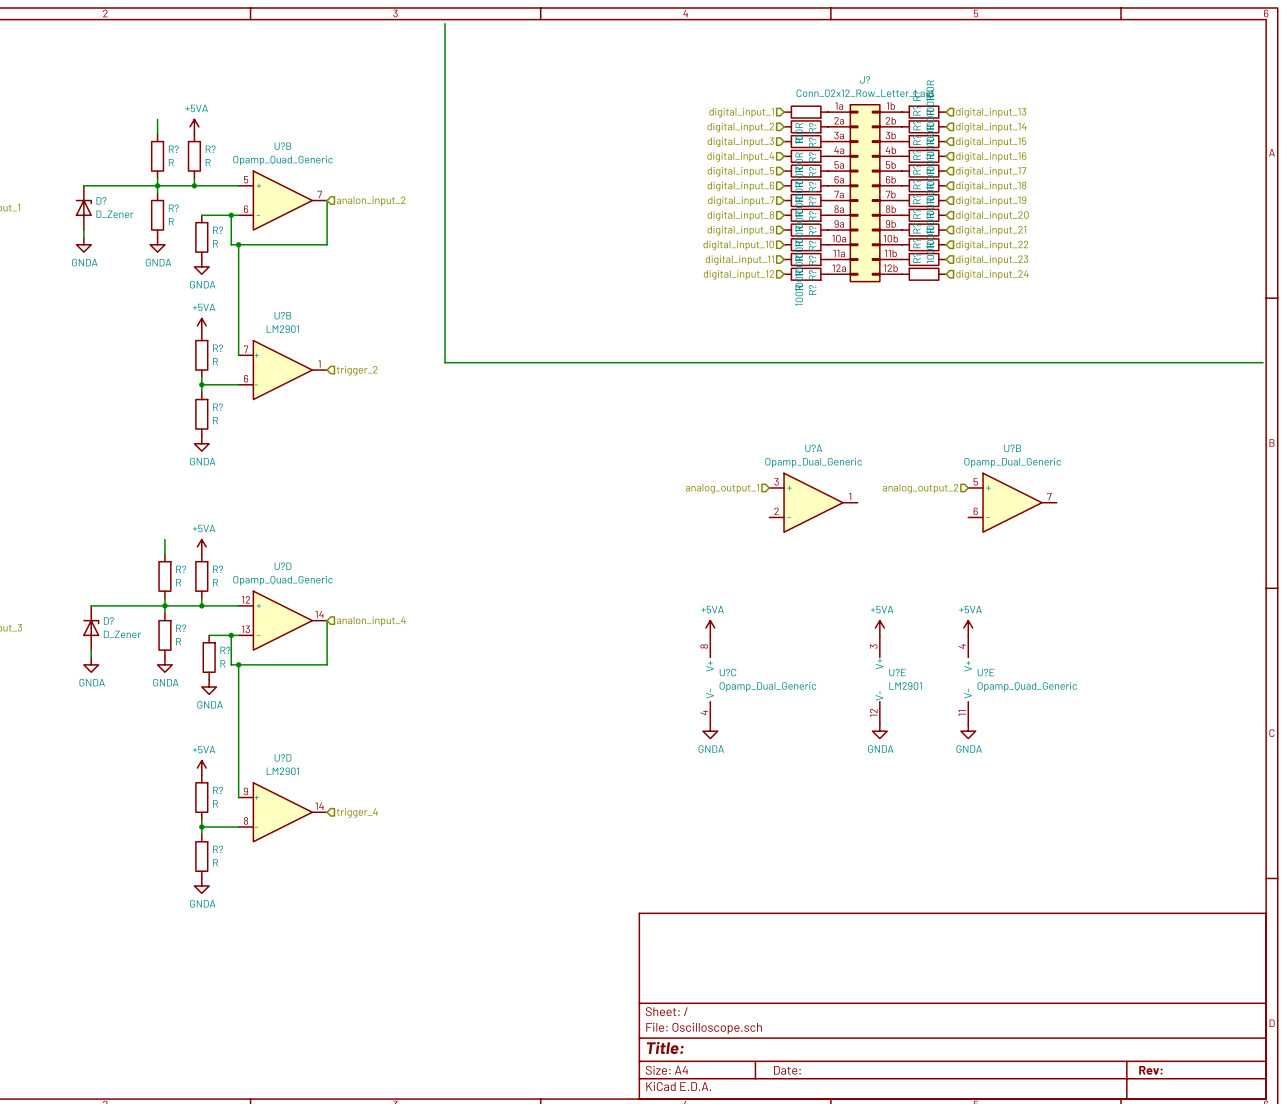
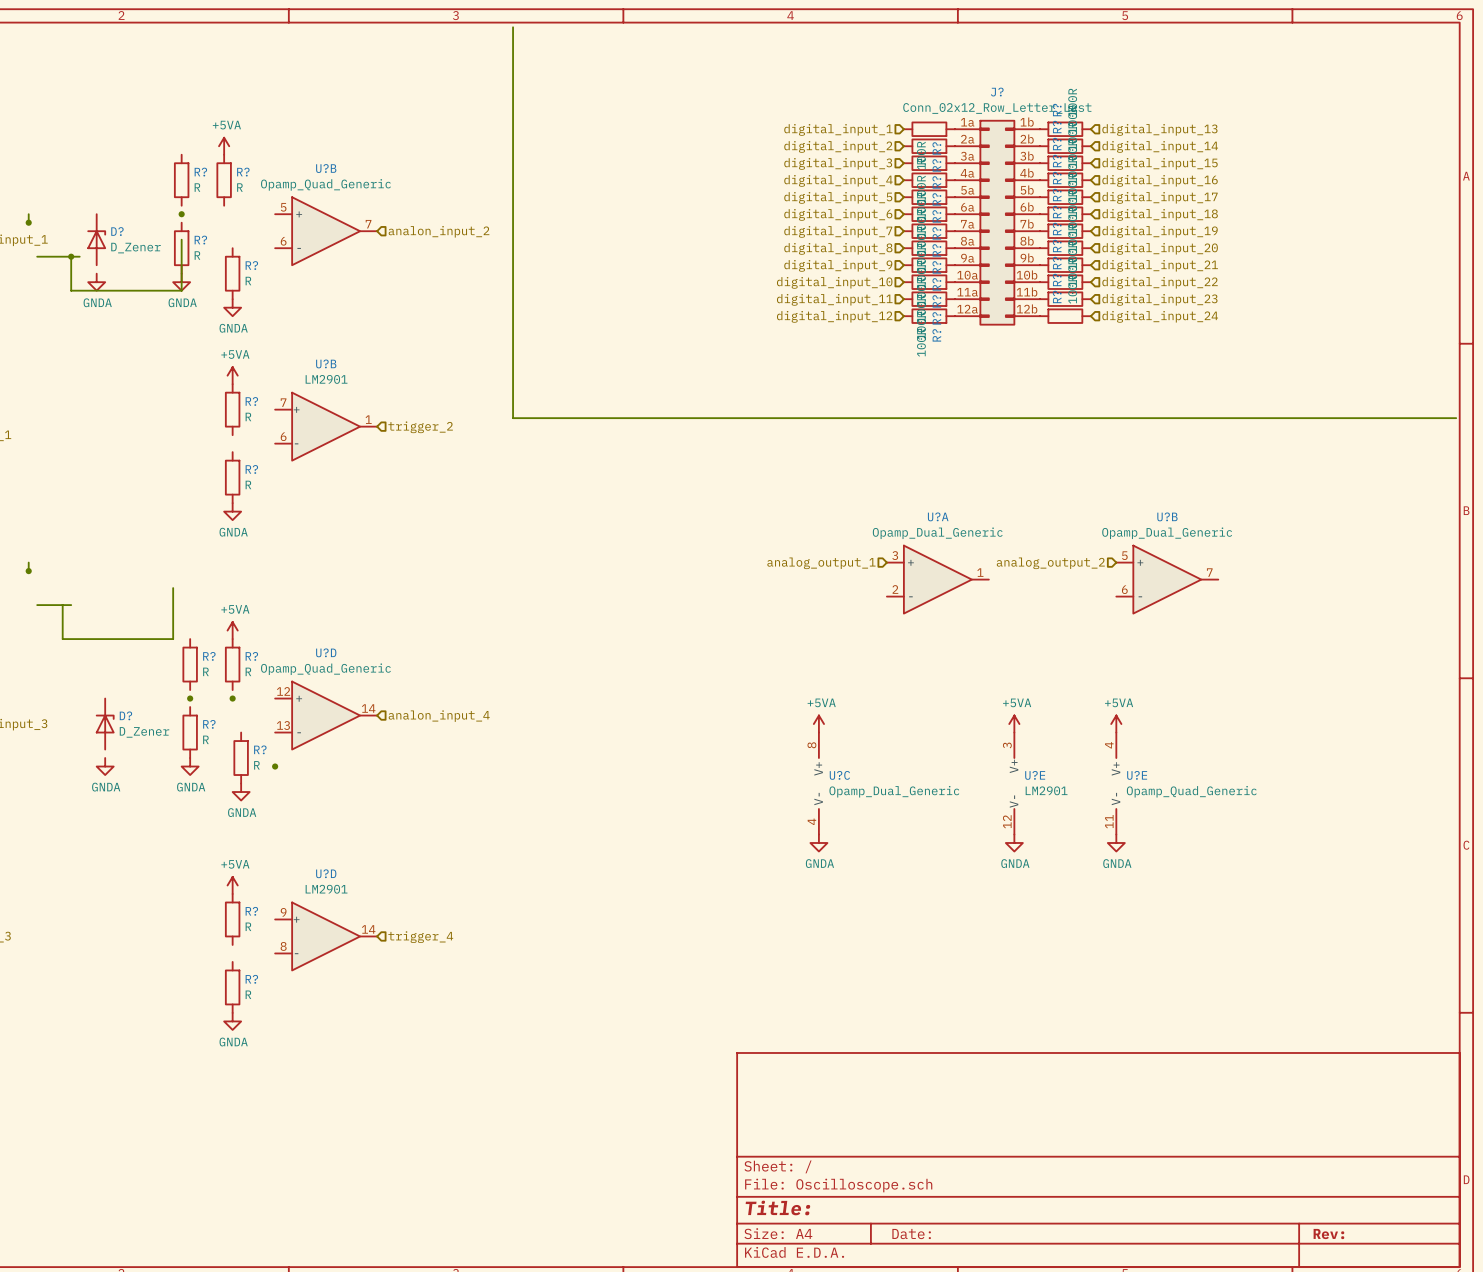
wire: (157, 119) (157, 134) -> none
wire: (157, 178) (157, 193) -> none
wire: (194, 178) (194, 185) -> none
wire: (83, 185) (238, 185) -> none
junction: (194, 185) -> none
junction: none -> (28, 222)
wire: (327, 200) (327, 244) (231, 244) (231, 215) -> none
wire: none -> (181, 239) (181, 290) (71, 290) (71, 256)
wire: (201, 215) (238, 215) -> none
junction: (231, 215) -> none
wire: none -> (37, 256) (79, 256)
junction: none -> (71, 256)
wire: (83, 230) (83, 237) -> (28, 214) (28, 222)
wire: (238, 244) (238, 355) -> none
junction: (238, 244) -> none
wire: (201, 377) (201, 392) -> none
wire: (201, 384) (238, 384) -> none
junction: (201, 384) -> none
wire: none -> (28, 562) (28, 571)
junction: none -> (28, 571)
wire: none -> (173, 588) (173, 639) (62, 639) (62, 605)
wire: none -> (37, 605) (71, 605)
wire: (164, 539) (164, 554) -> none
wire: (164, 598) (164, 613) -> none
wire: (201, 598) (201, 605) -> none
wire: (91, 605) (238, 605) -> none
wire: (327, 620) (327, 664) (231, 664) (231, 635) -> none
wire: (209, 635) (238, 635) -> none
junction: (231, 635) -> none
wire: (91, 650) (91, 657) -> none
wire: (238, 664) (238, 797) -> none
wire: (201, 819) (201, 834) -> none
wire: (201, 827) (238, 827) -> none
junction: (201, 827) -> none

